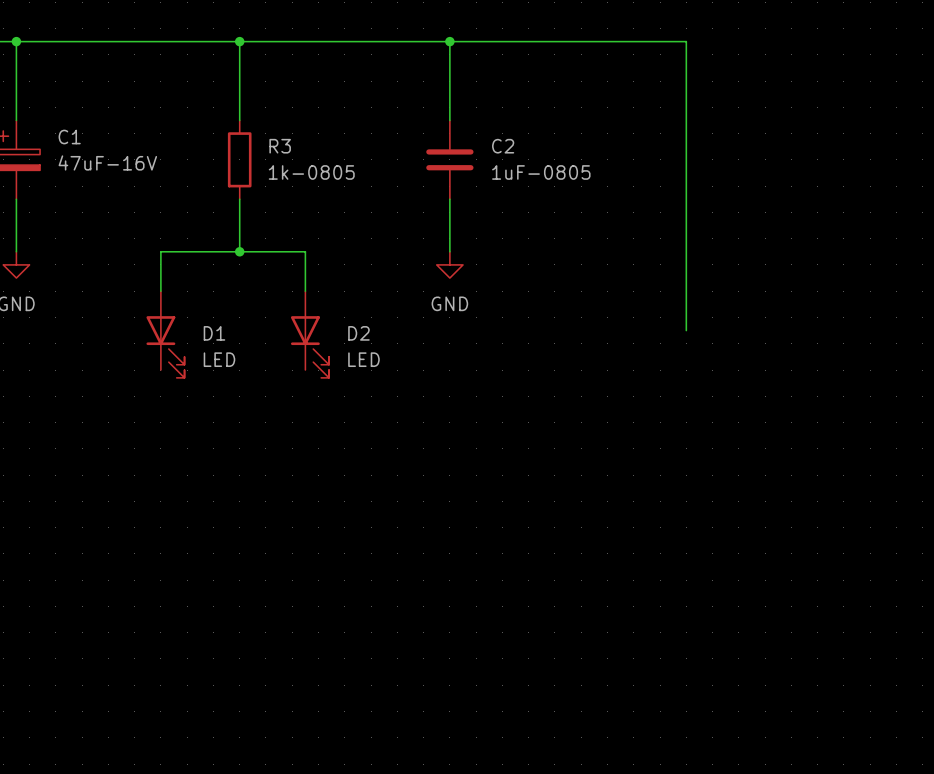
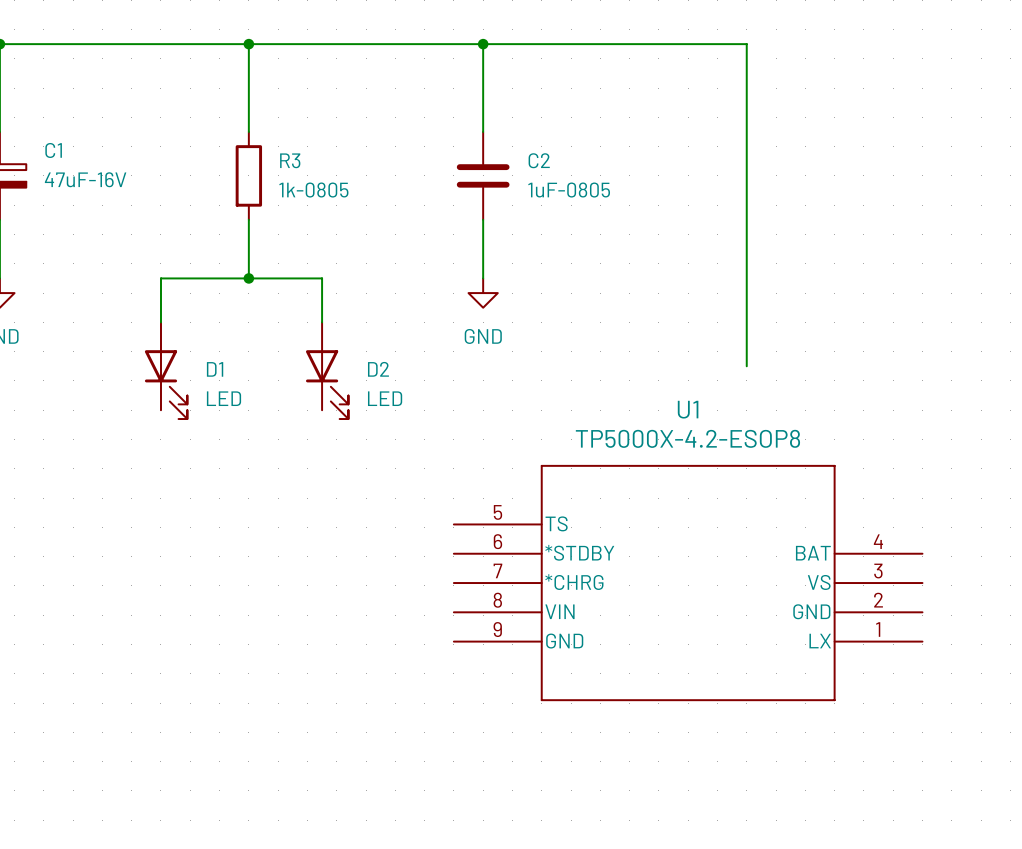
U1: none -> TP5000X-4.2-ESOP8 (688, 583)

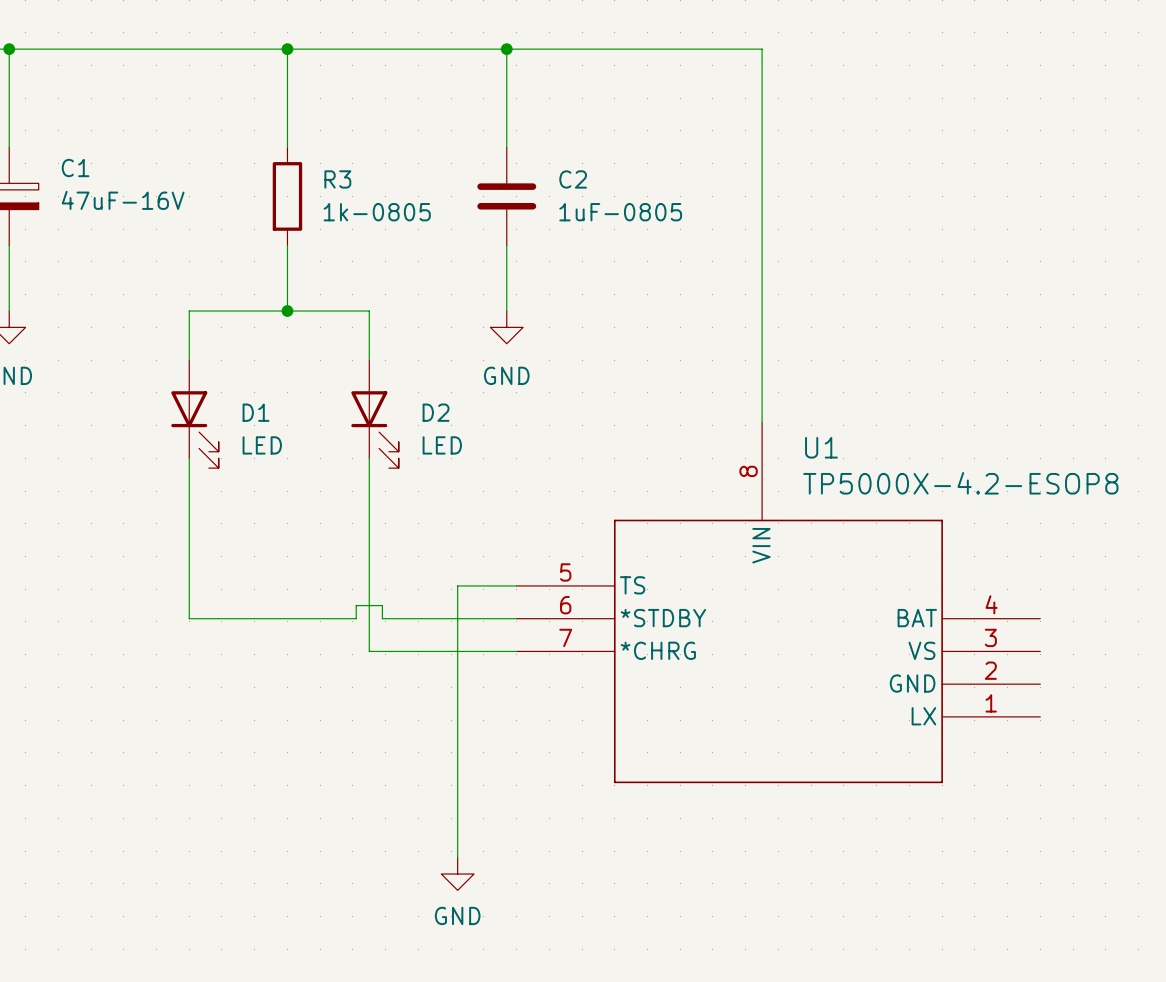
wire: (483, 44) (483, 131) -> (506, 49) (506, 147)
junction position: (483, 44) -> (506, 49)
wire: (673, 44) (746, 44) (746, 366) -> (762, 49) (762, 422)
C2 position: (483, 175) -> (506, 196)
wire: (483, 219) (483, 278) -> (506, 245) (506, 311)
power symbol position: GND (483, 293) -> GND (506, 327)
U1 name position: U1 (688, 409) -> U1 (821, 447)
wire: none -> (189, 458) (189, 618) (356, 618) (356, 605) (382, 605) (382, 618) (516, 618)
wire: none -> (369, 458) (369, 651) (516, 651)
U1 value position: TP5000X-4.2-ESOP8 (687, 438) -> TP5000X-4.2-ESOP8 (960, 483)
U1 symbol: [453, 465, 923, 701] -> [516, 422, 1041, 784]
wire: none -> (516, 585) (457, 585) (457, 857)
power symbol: none -> GND (457, 874)

